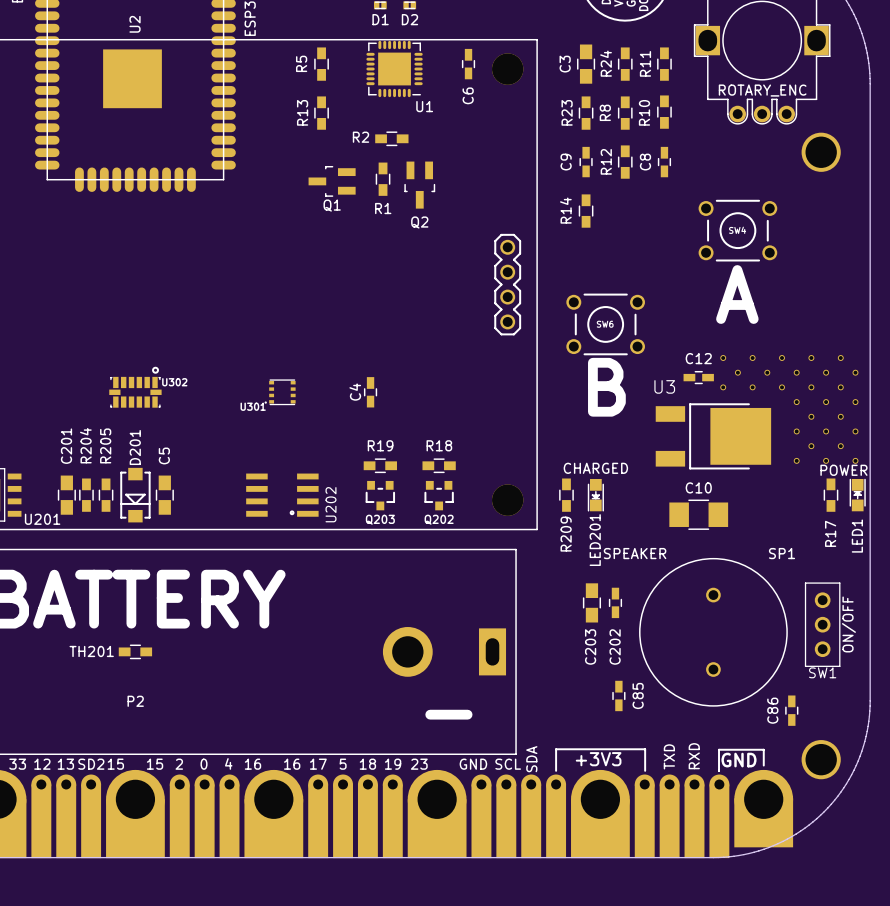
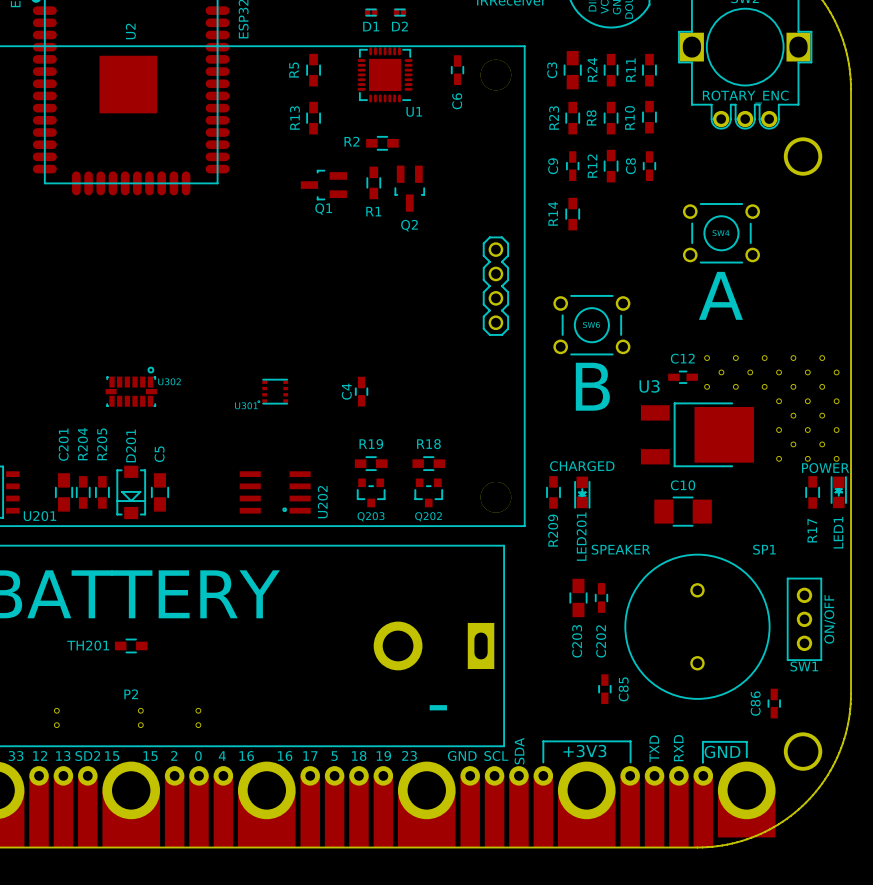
part: none -> (56, 710)
part: none -> (140, 710)
part: none -> (198, 710)
part: none -> (56, 725)
part: none -> (140, 725)
part: none -> (198, 725)

